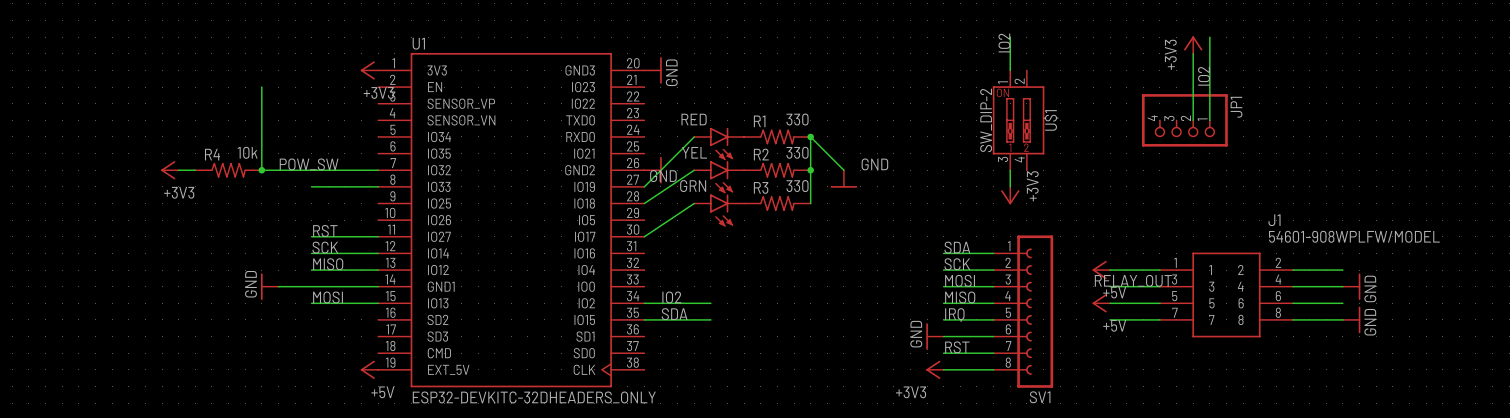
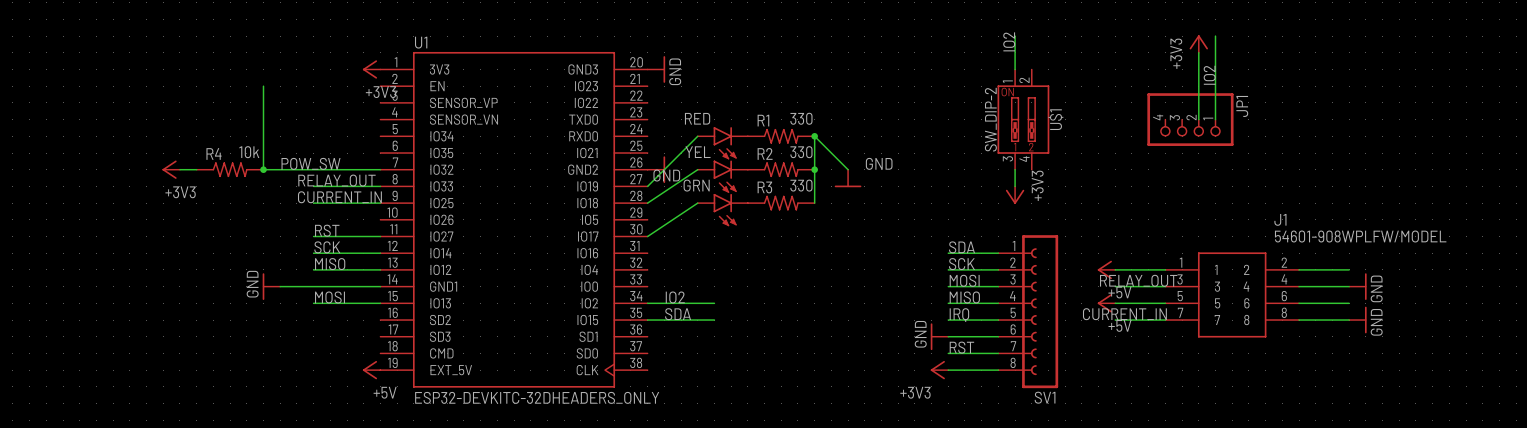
label: none -> RELAY_OUT (336, 180)
label: none -> CURRENT_IN (339, 197)
wire: none -> (313, 203) (380, 203)
label: none -> CURRENT_IN (1124, 314)

